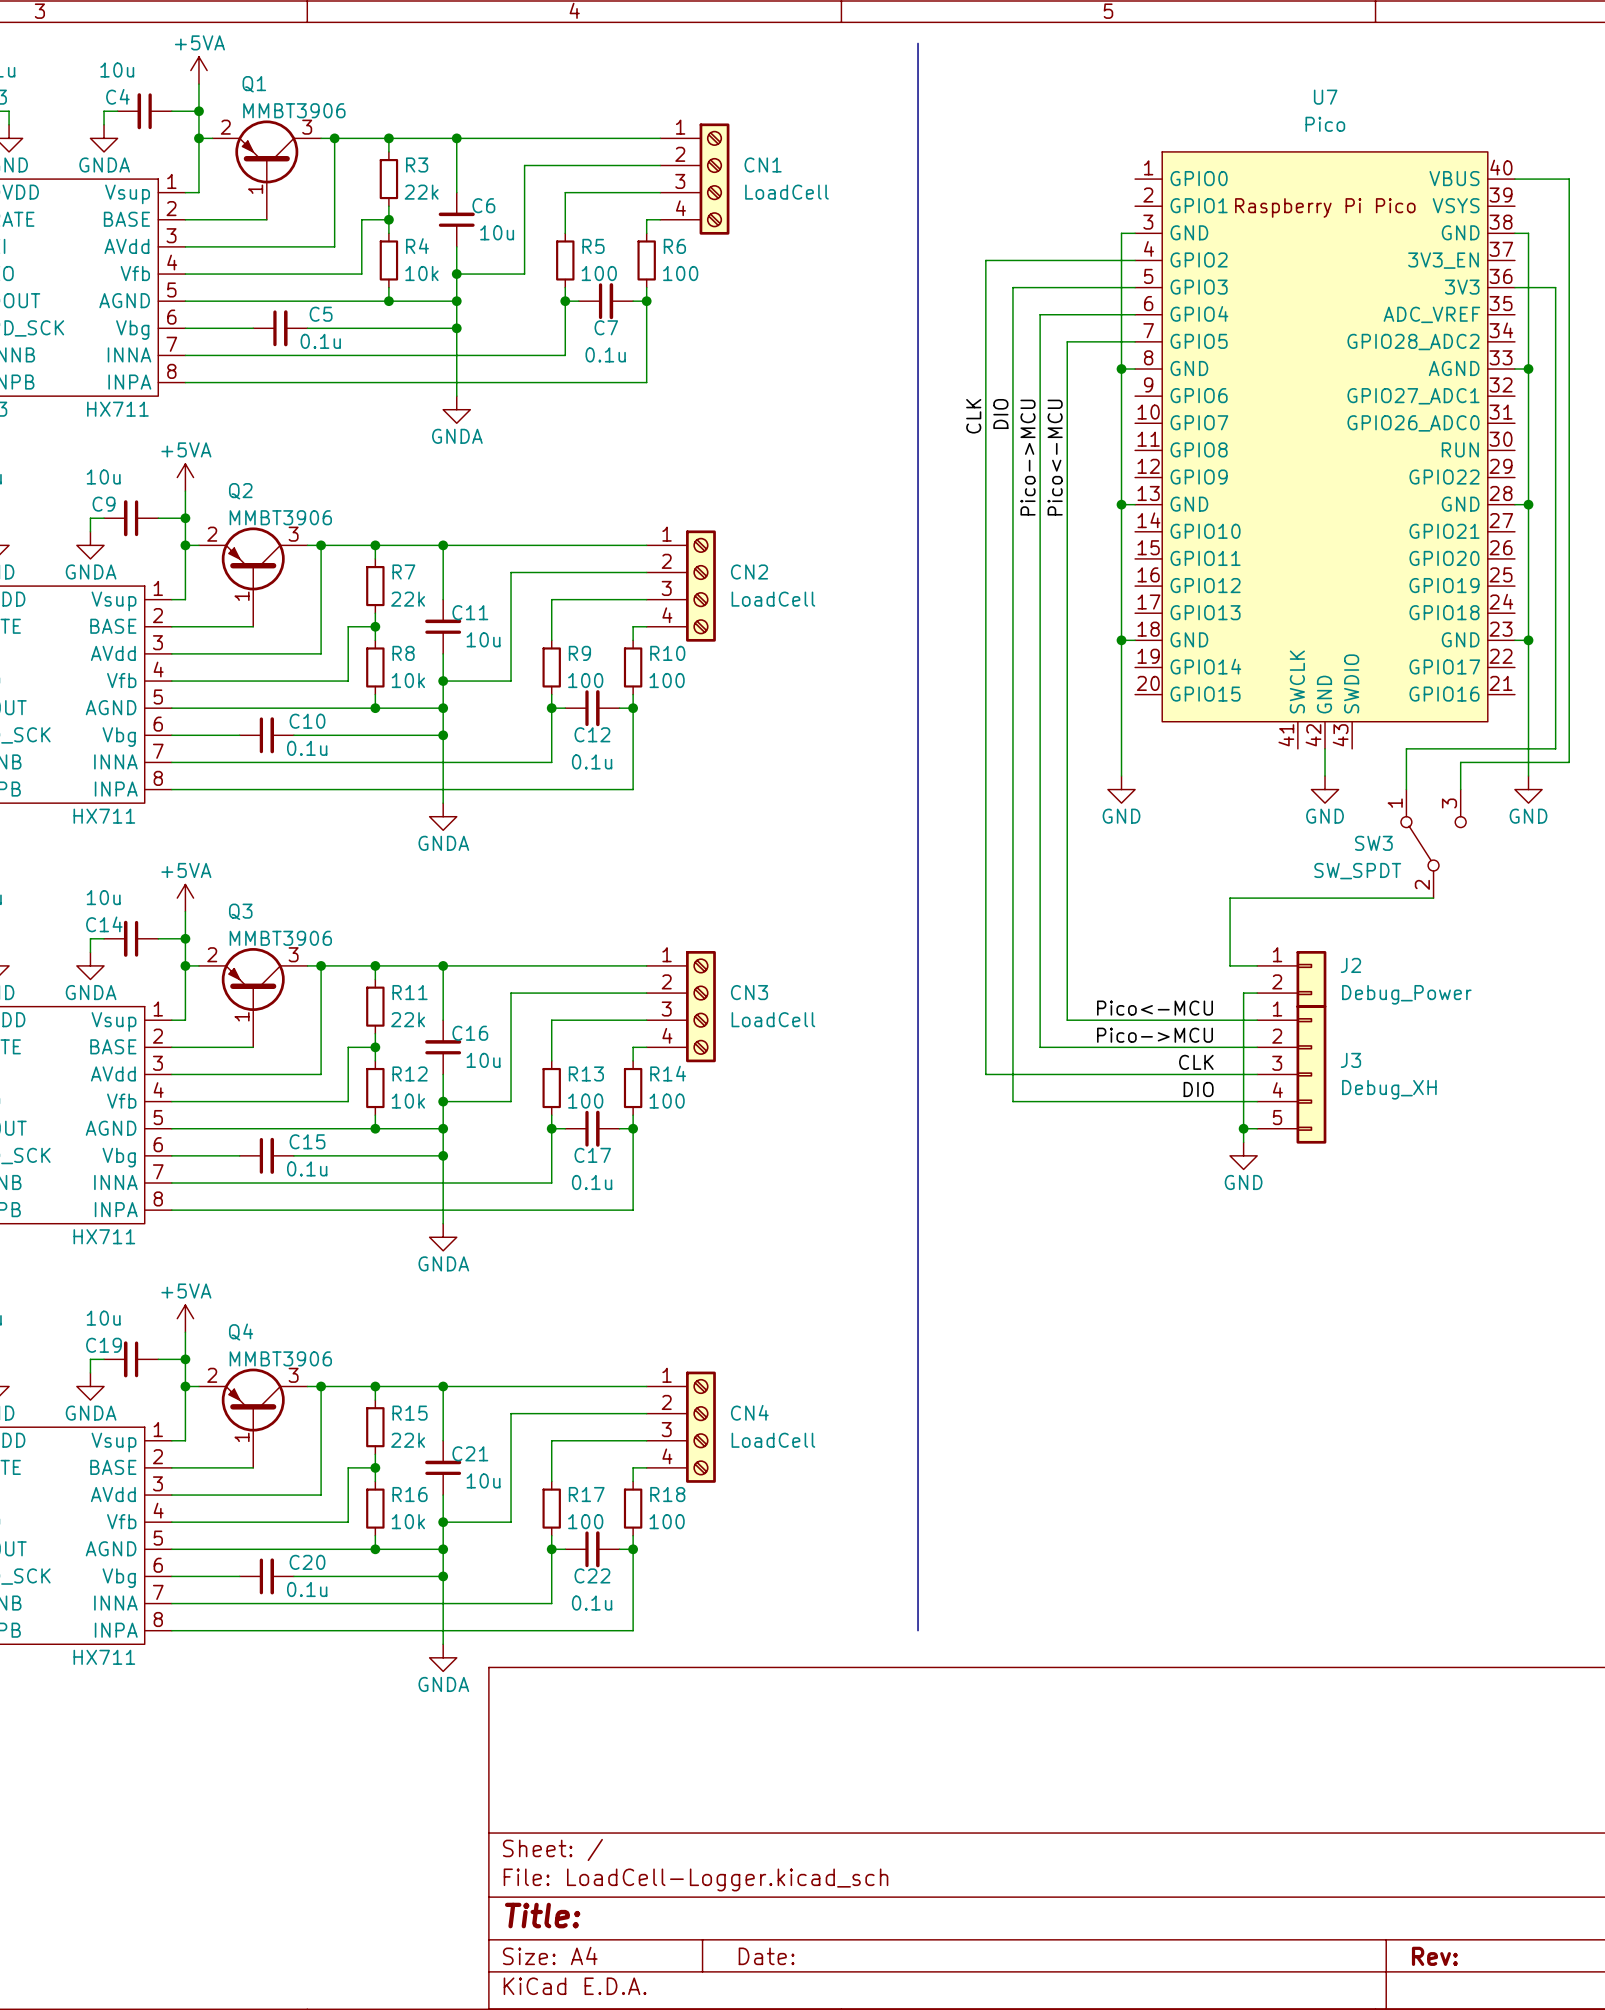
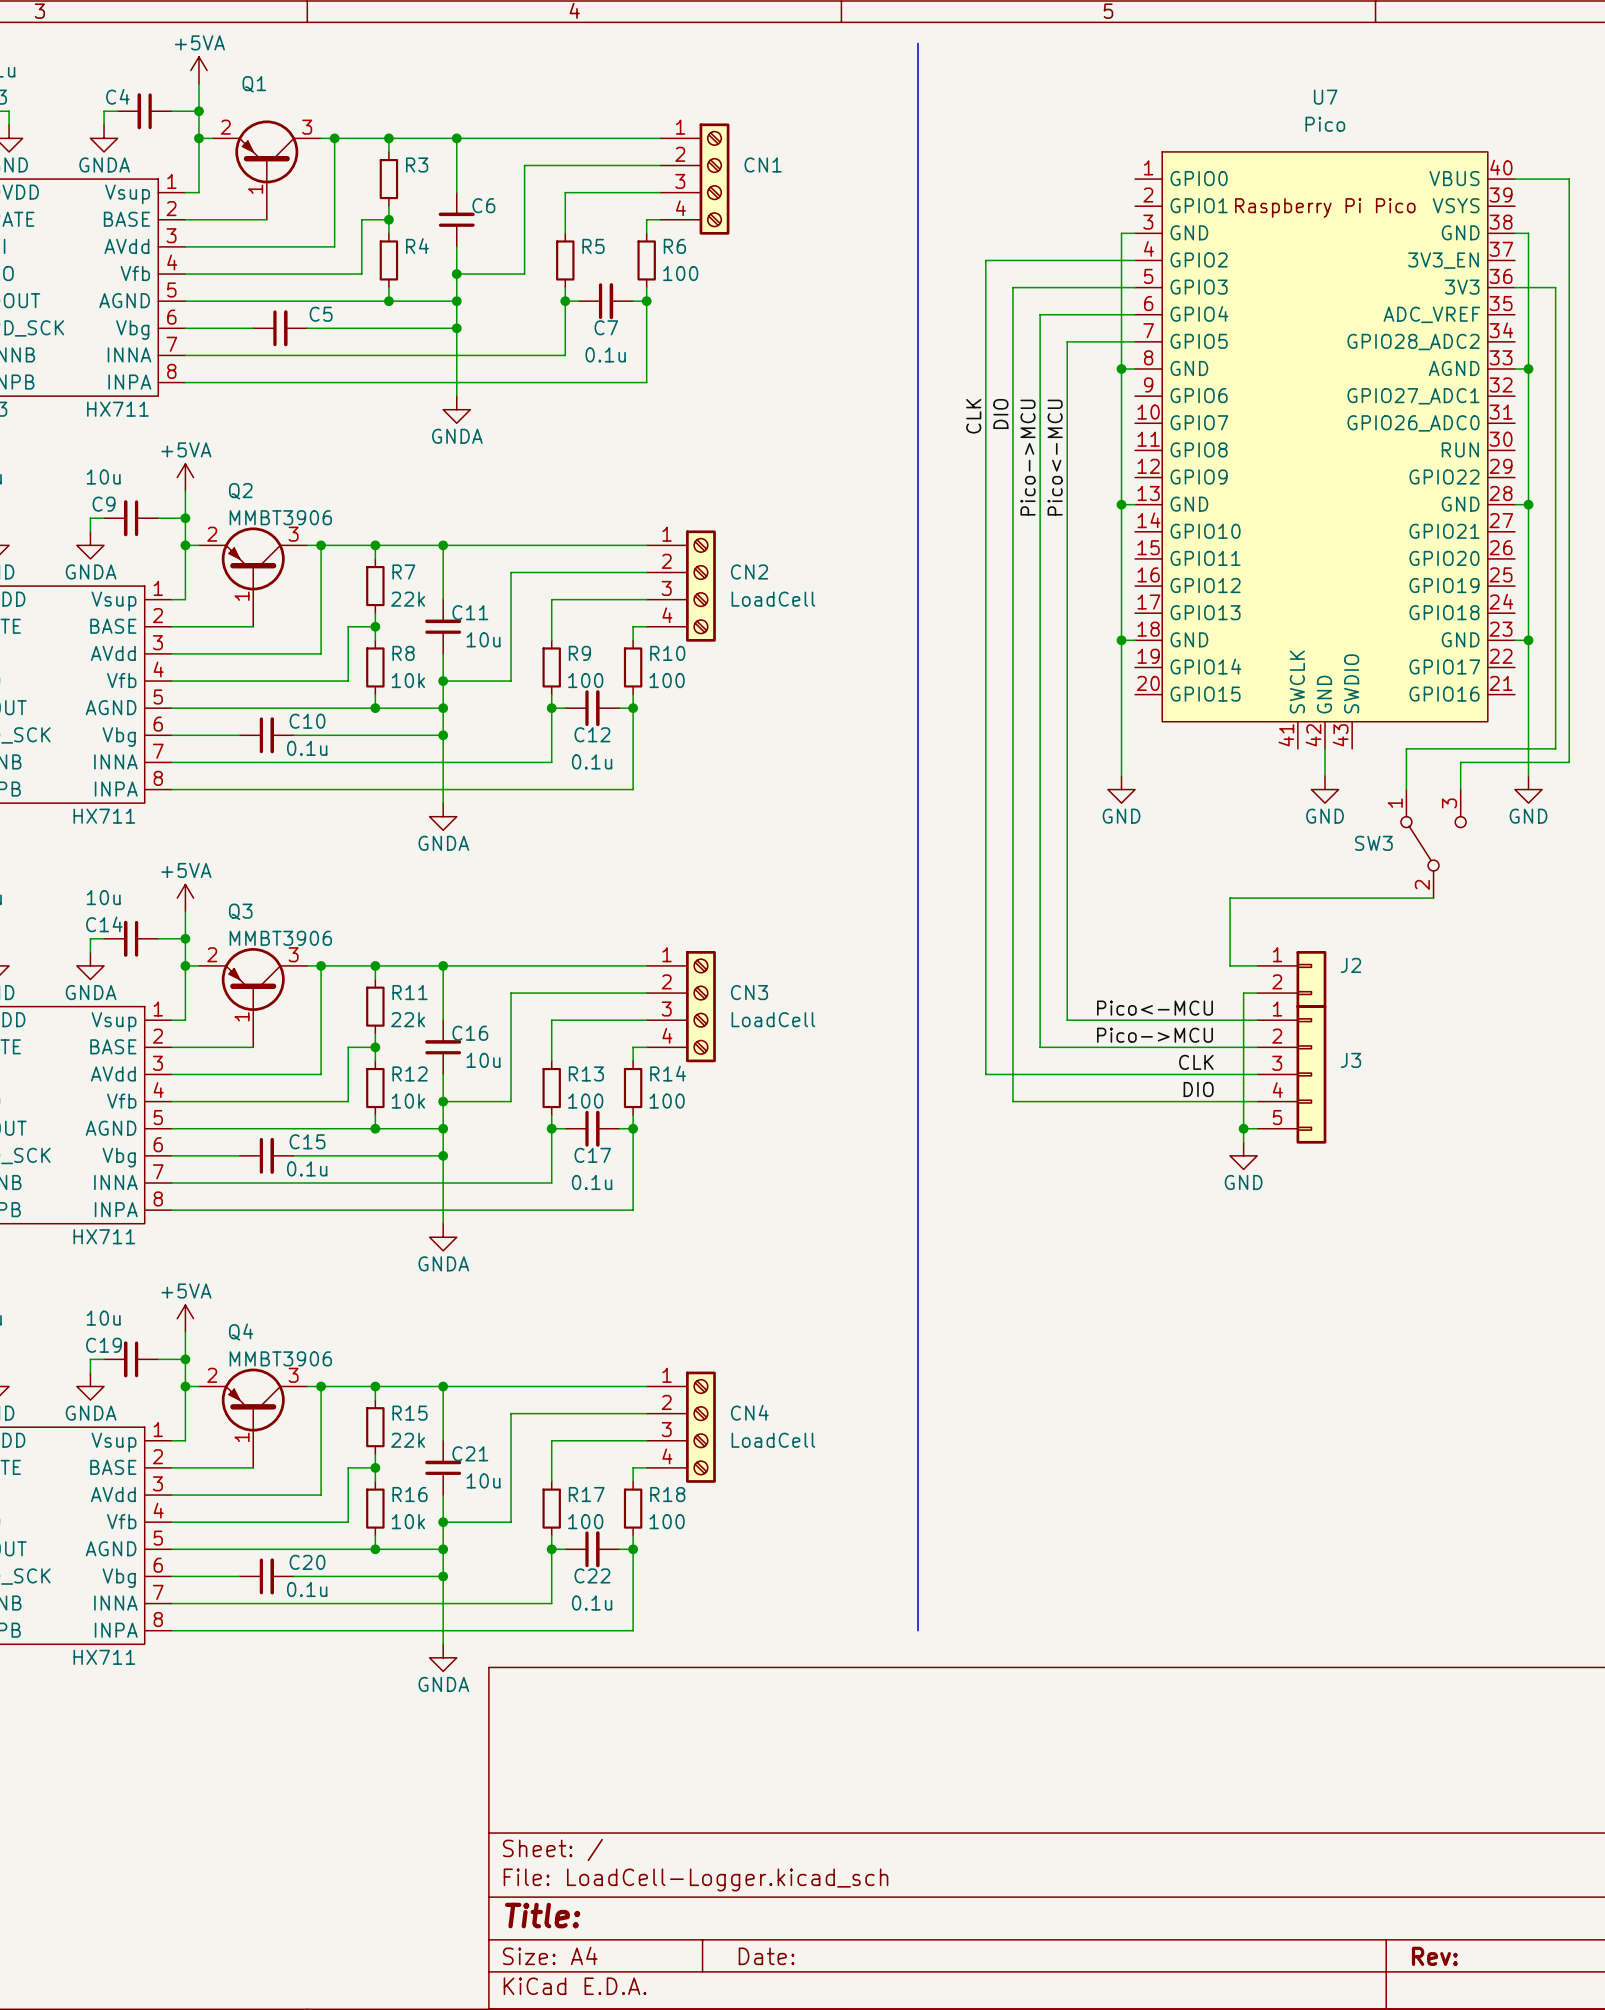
C4 value: 10u (117, 70) -> none
Q1 value: MMBT3906 (294, 110) -> none
R3 value: 22k (421, 192) -> none
CN1 value: LoadCell (786, 192) -> none
C6 value: 10u (497, 232) -> none
R4 value: 10k (421, 273) -> none
R5 value: 100 (599, 273) -> none
C5 value: 0.1u (320, 341) -> none
SW3 value: SW_SPDT (1357, 871) -> none
J2 value: Debug_Power (1406, 994) -> none
J3 value: Debug_XH (1389, 1089) -> none

